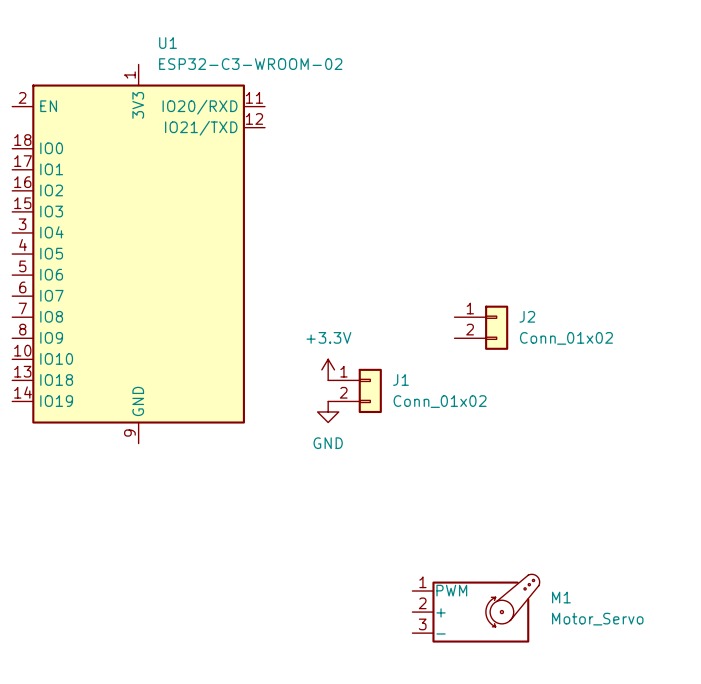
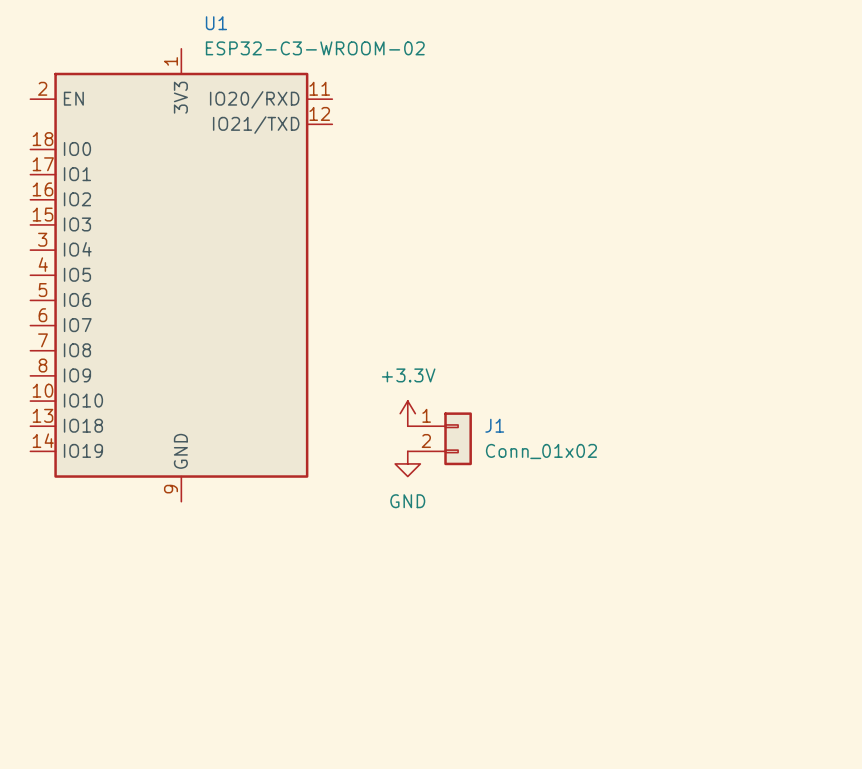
J2: Conn_01x02 (481, 327) -> none
M1: Motor_Servo (476, 608) -> none

